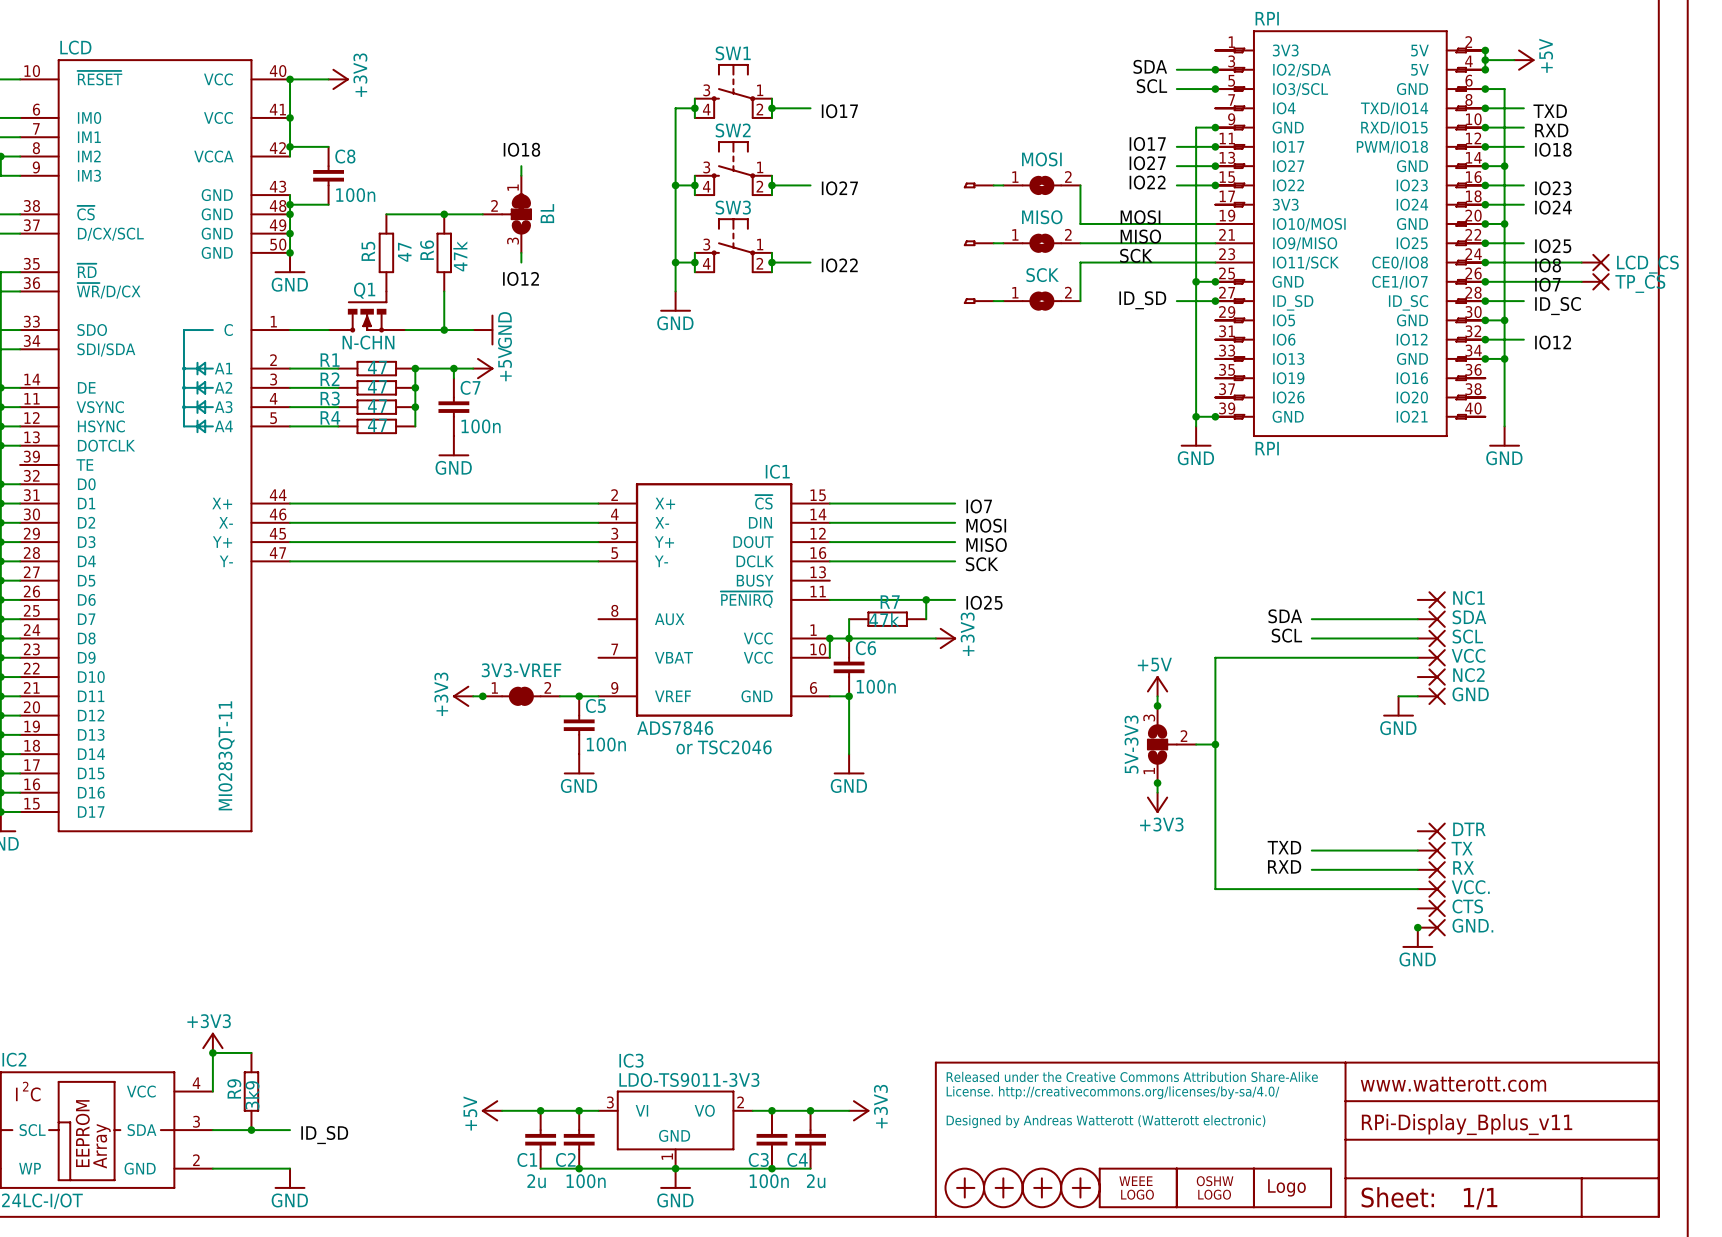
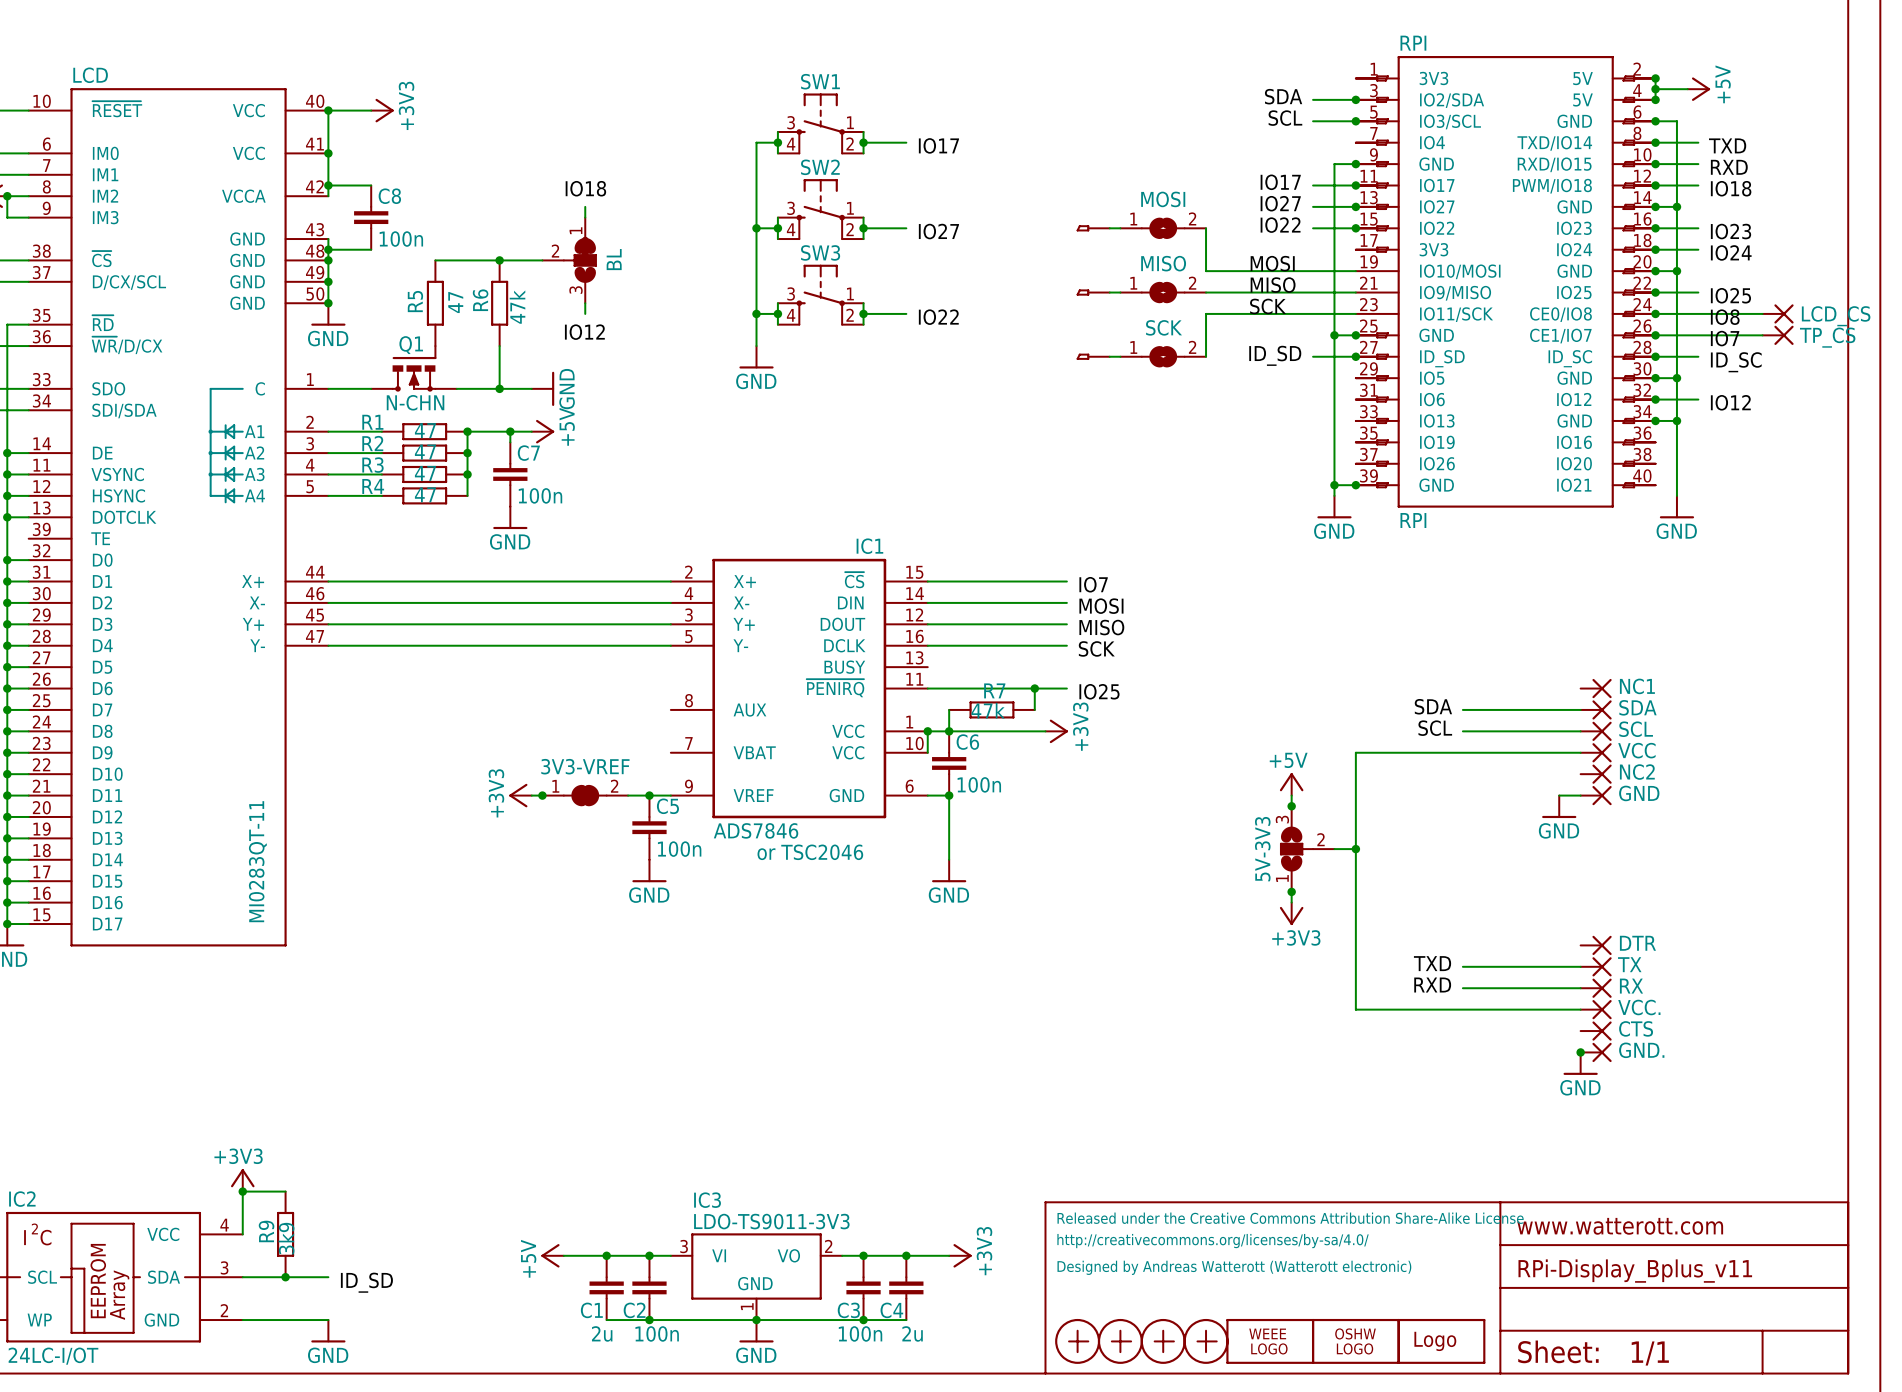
text: License. http://creativecommons.org/licenses/by-sa/4.0/ (1113, 1092) -> Released under the Creative Commons Attribution Share-Alike License (1290, 1218)
text: none -> http://creativecommons.org/licenses/by-sa/4.0/ (1213, 1241)

